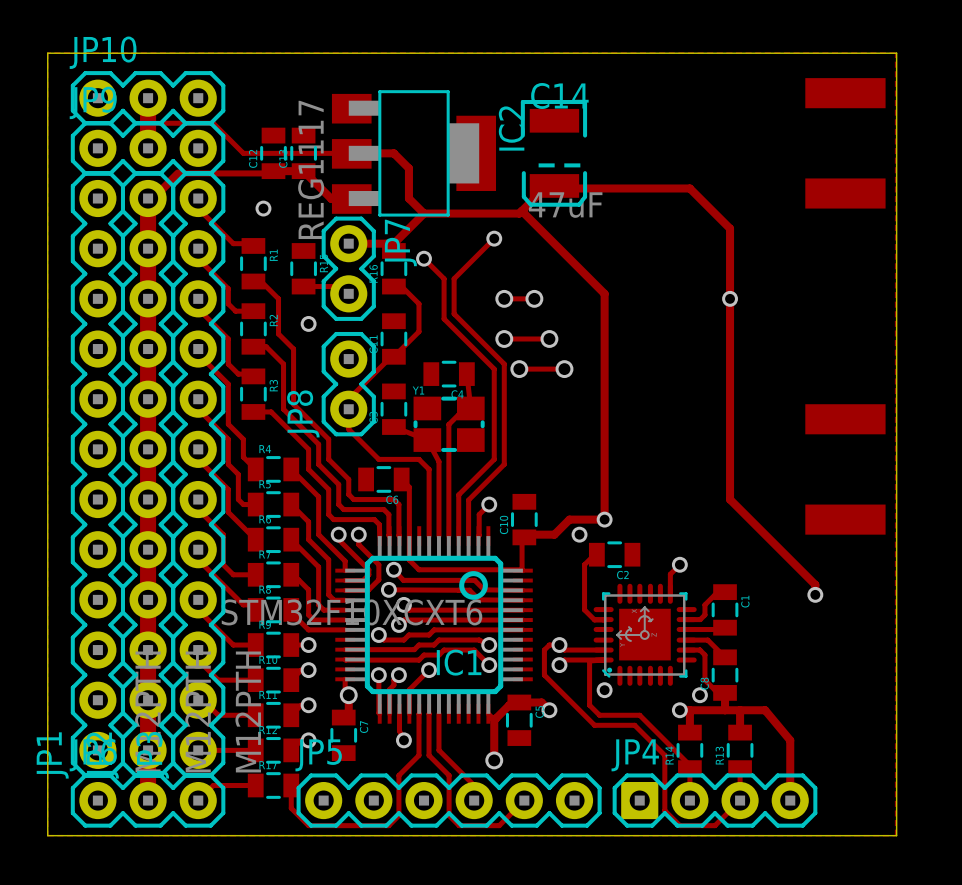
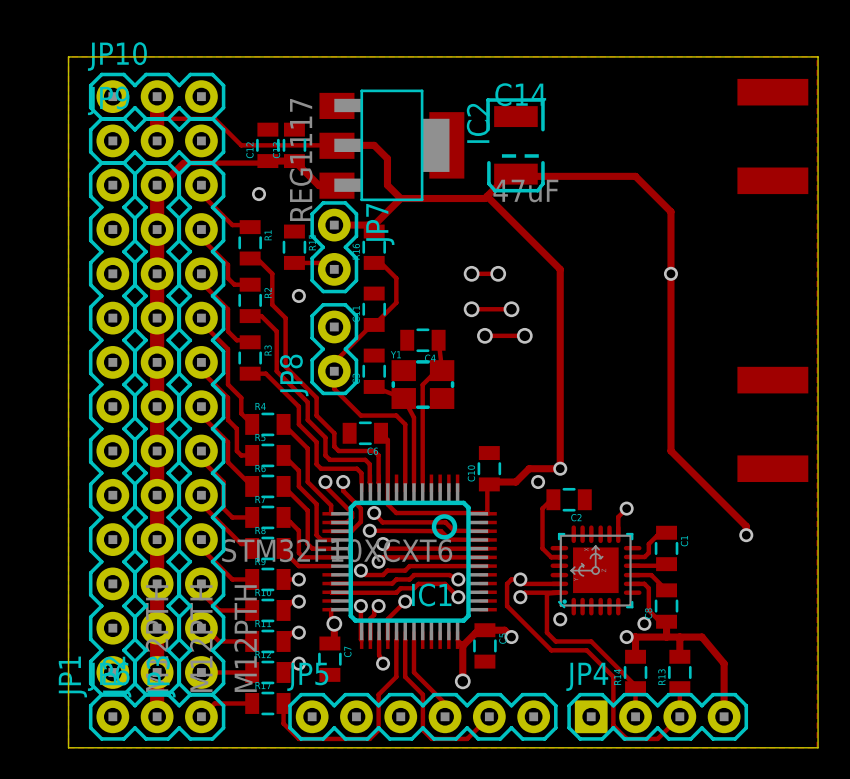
track: (494, 238) (454, 278) (454, 313) (504, 364) (504, 464) (468, 500) (468, 536) -> none
via: (494, 238) -> none
track: (424, 258) (444, 278) (444, 318) (494, 369) (494, 459) (458, 494) (458, 536) -> none
via: (424, 258) -> none
track: (489, 504) (479, 514) (478, 536) -> none
via: (489, 504) -> none

